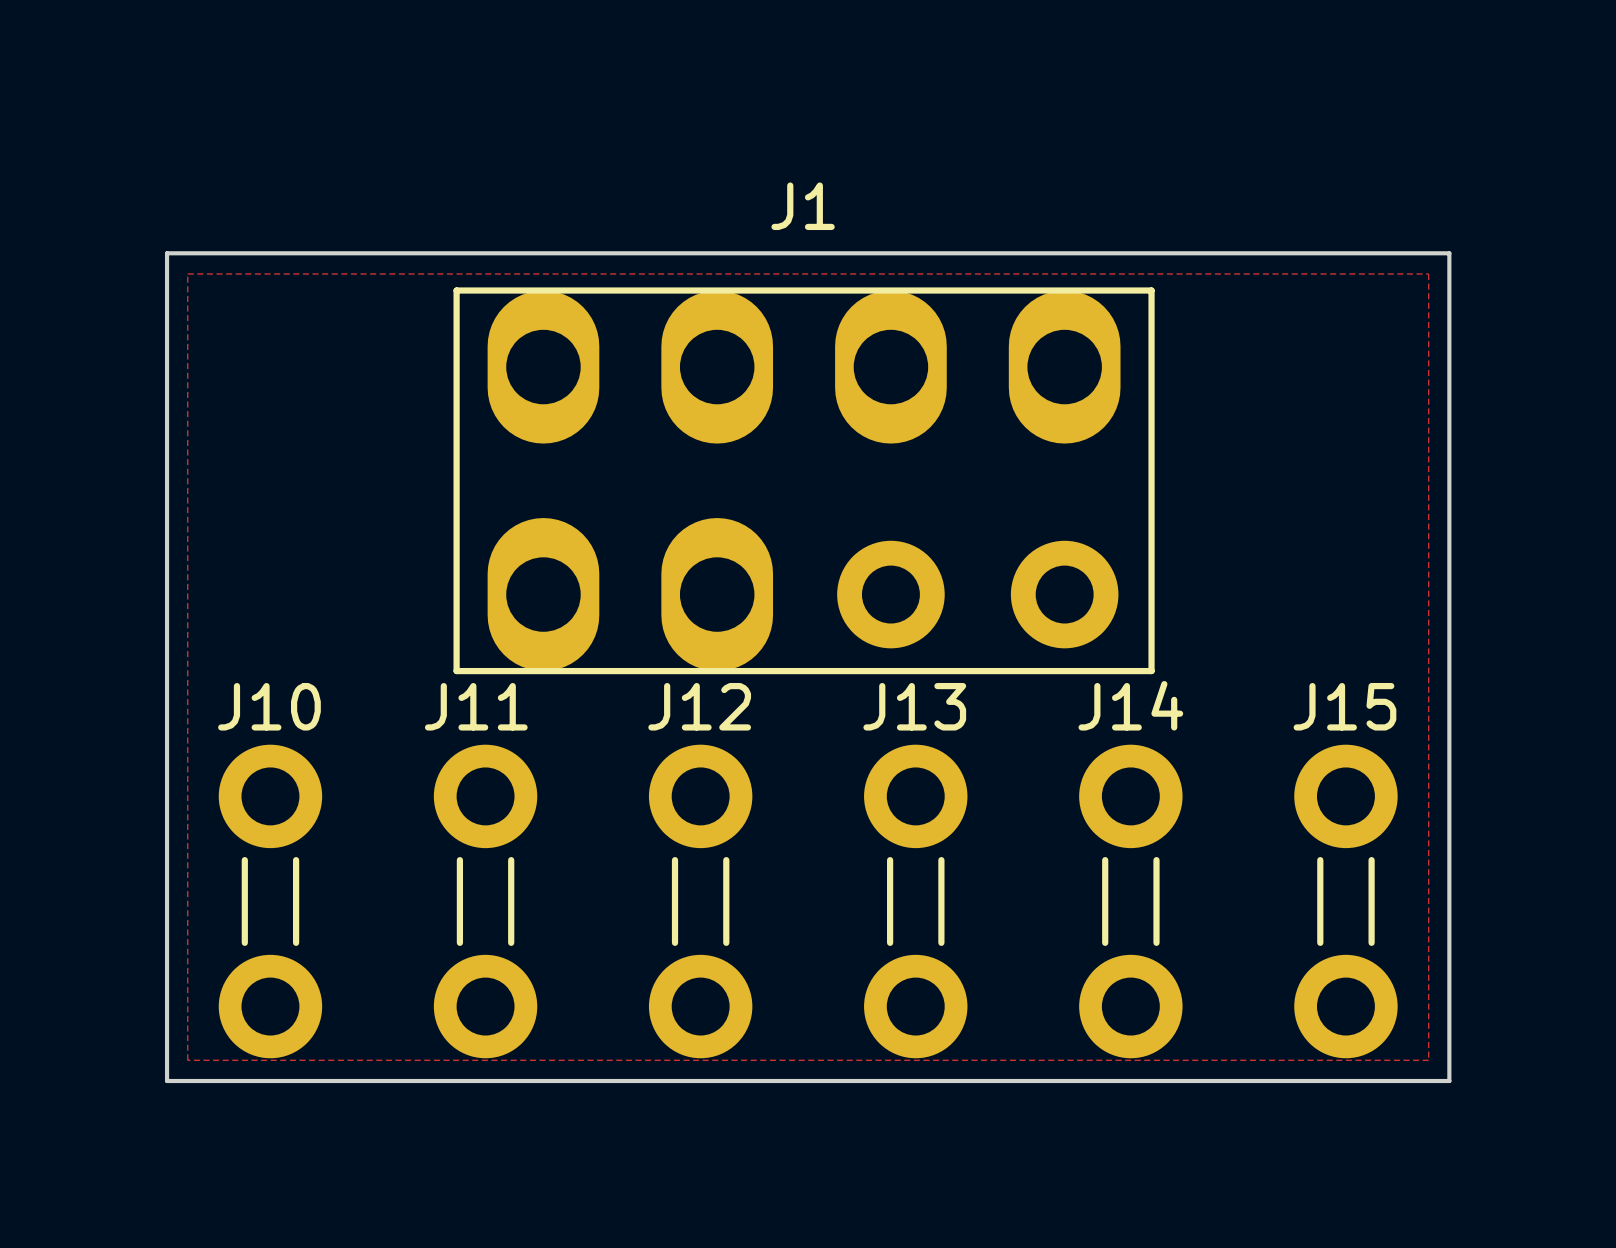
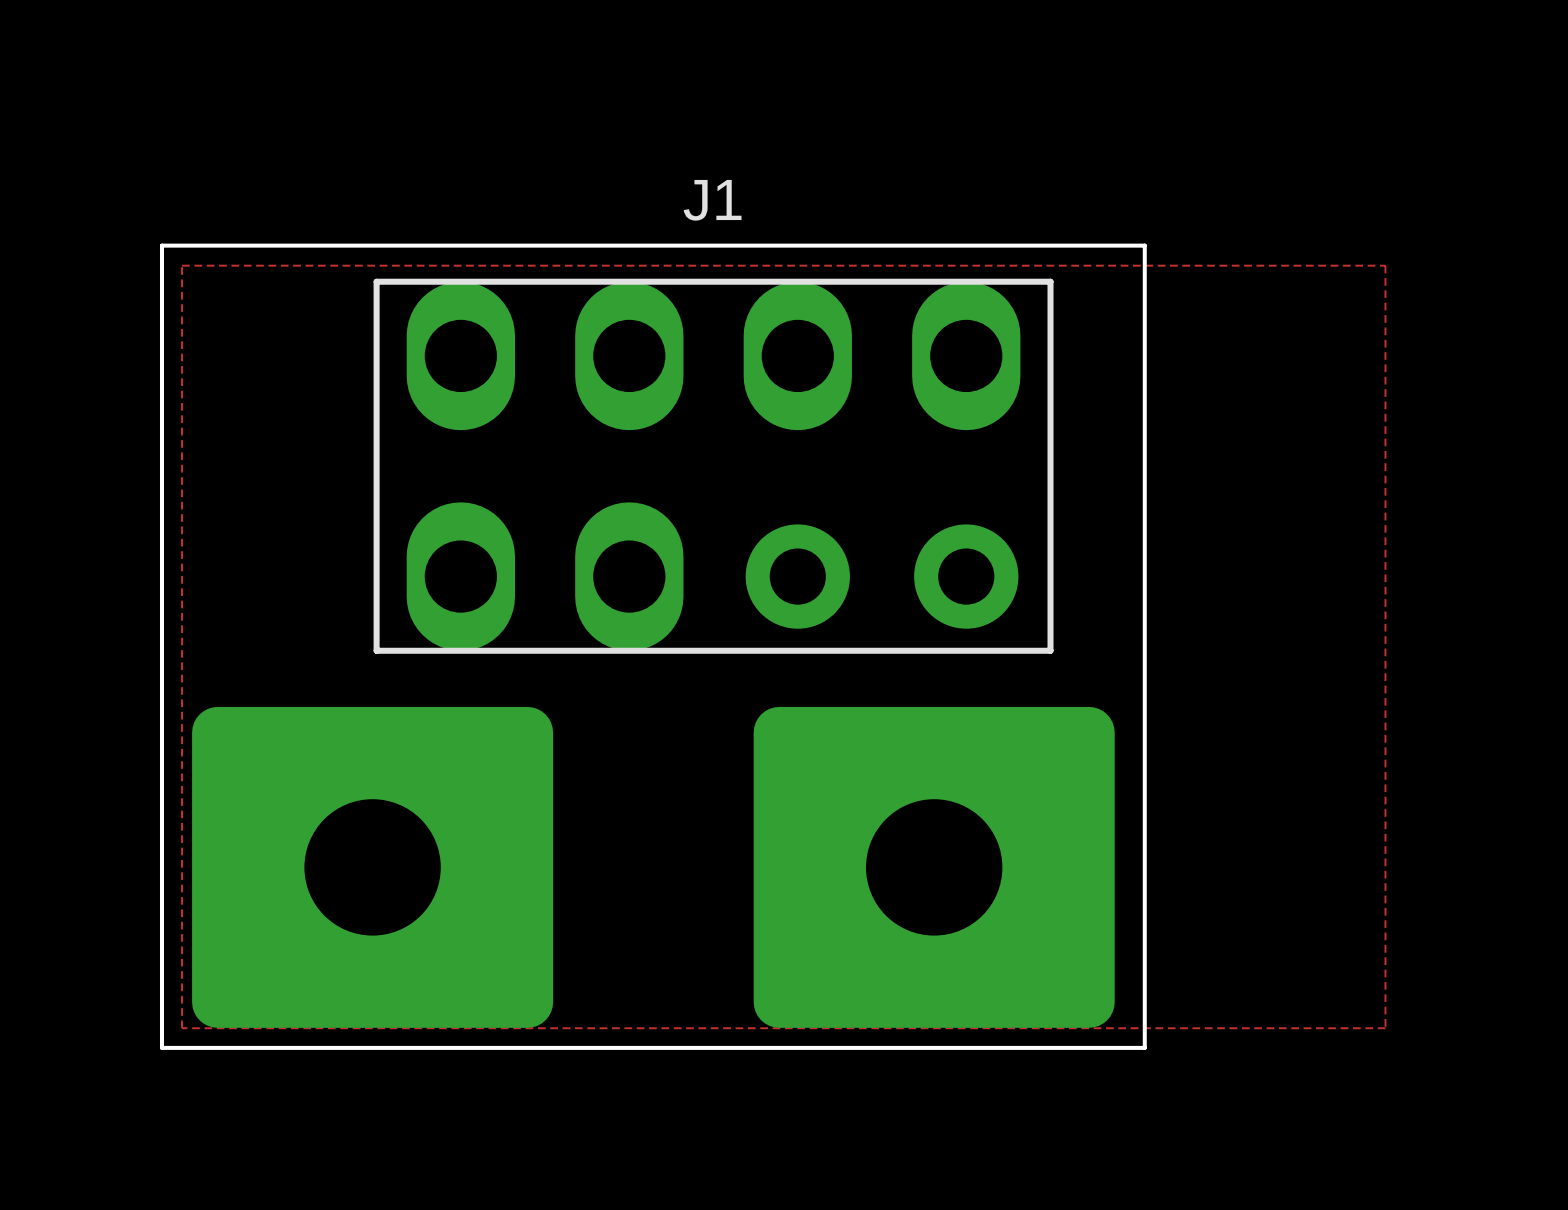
board edge: (1180, 253) (1449, 253) (1449, 1081) (167, 1081) -> (1144, 245) (1144, 1047) (161, 1047)
J1 position: (804, 480) -> (713, 466)
part: none -> (372, 867)
part: none -> (934, 867)
J10: (270, 901) -> none
J11: (485, 901) -> none
J12: (700, 901) -> none
J13: (915, 901) -> none
J14: (1130, 901) -> none
J15: (1345, 901) -> none

